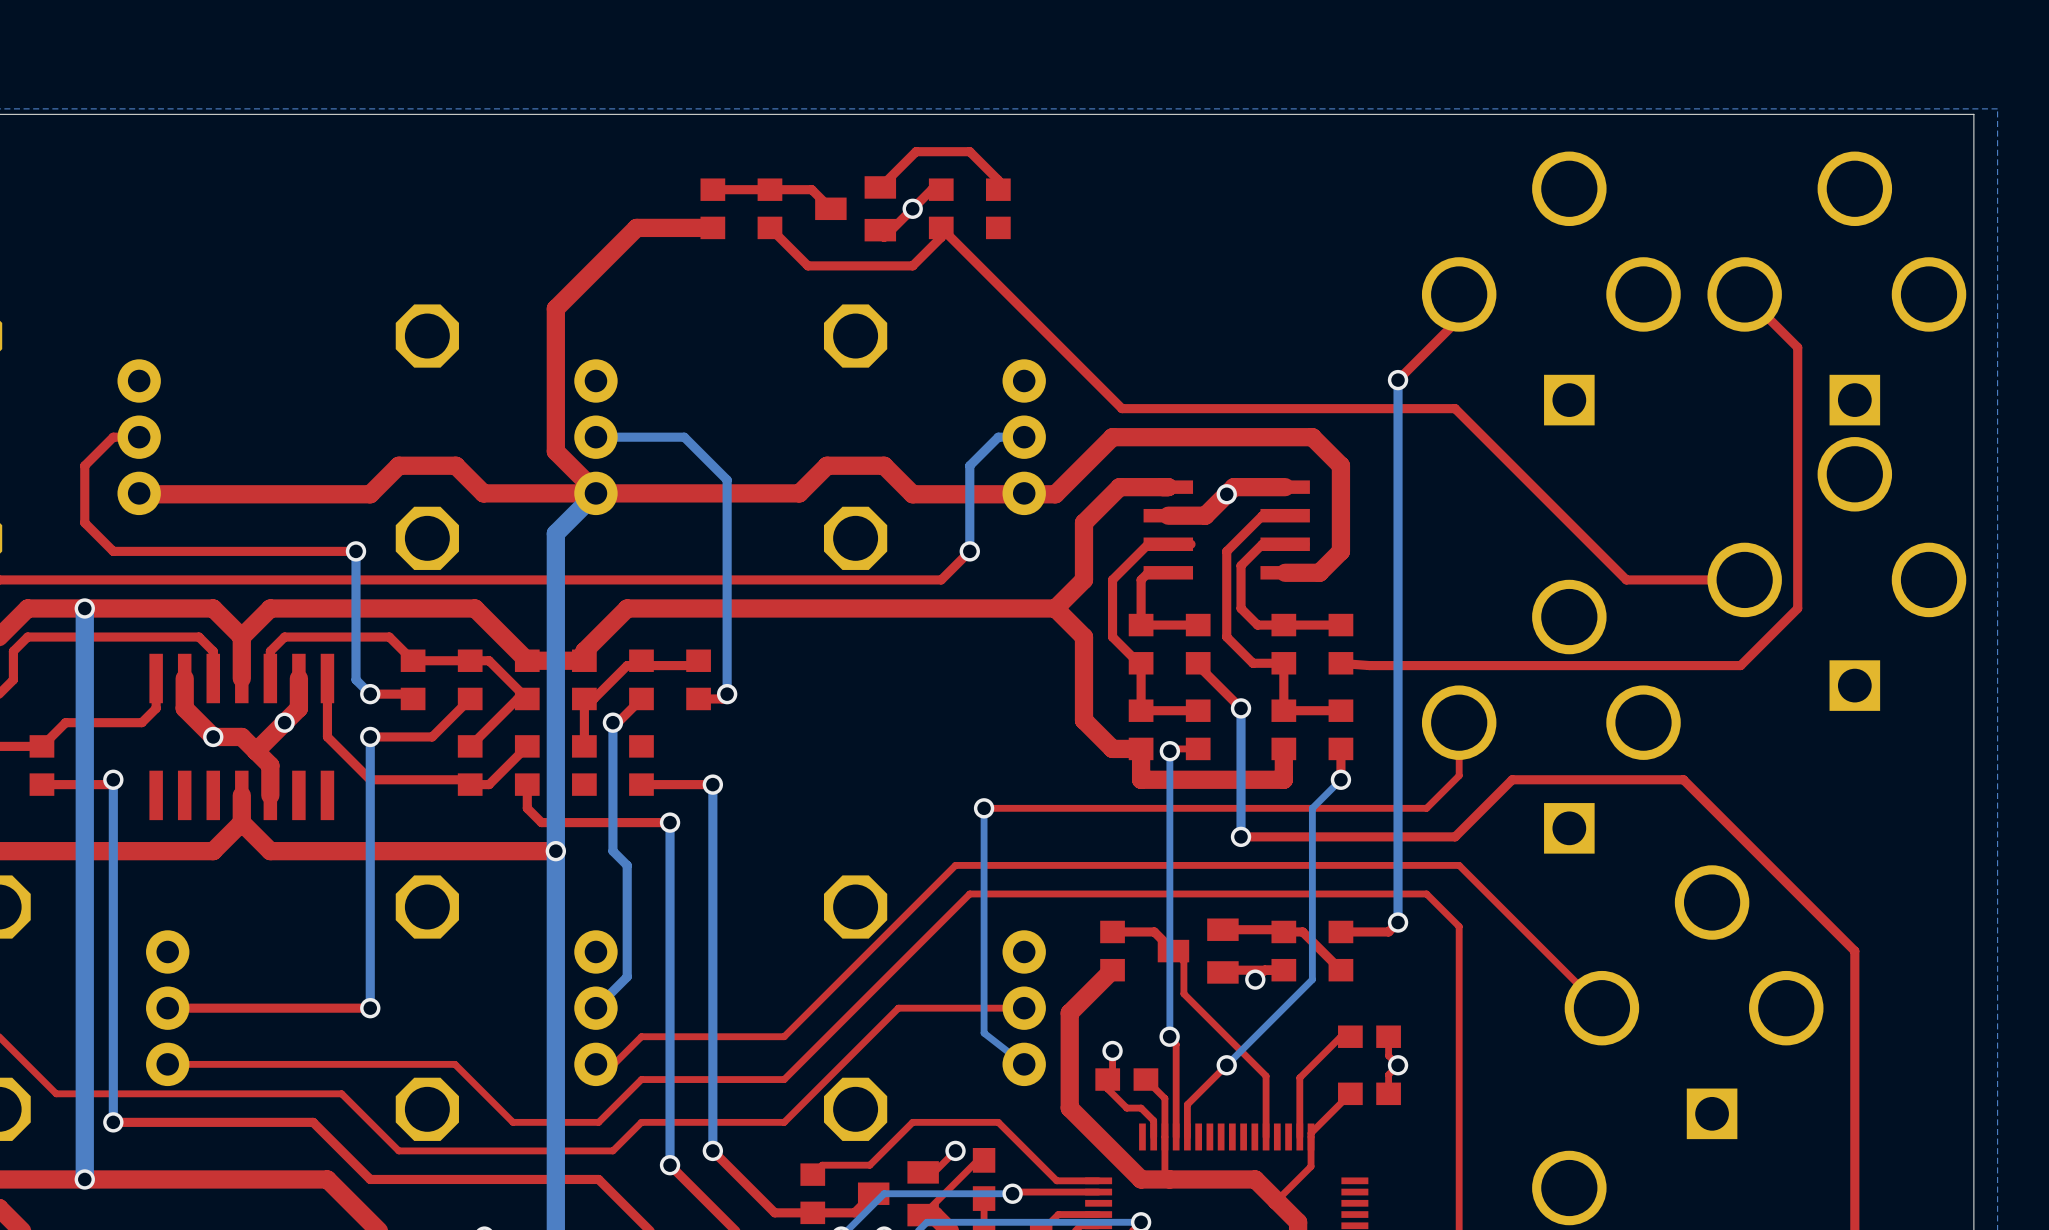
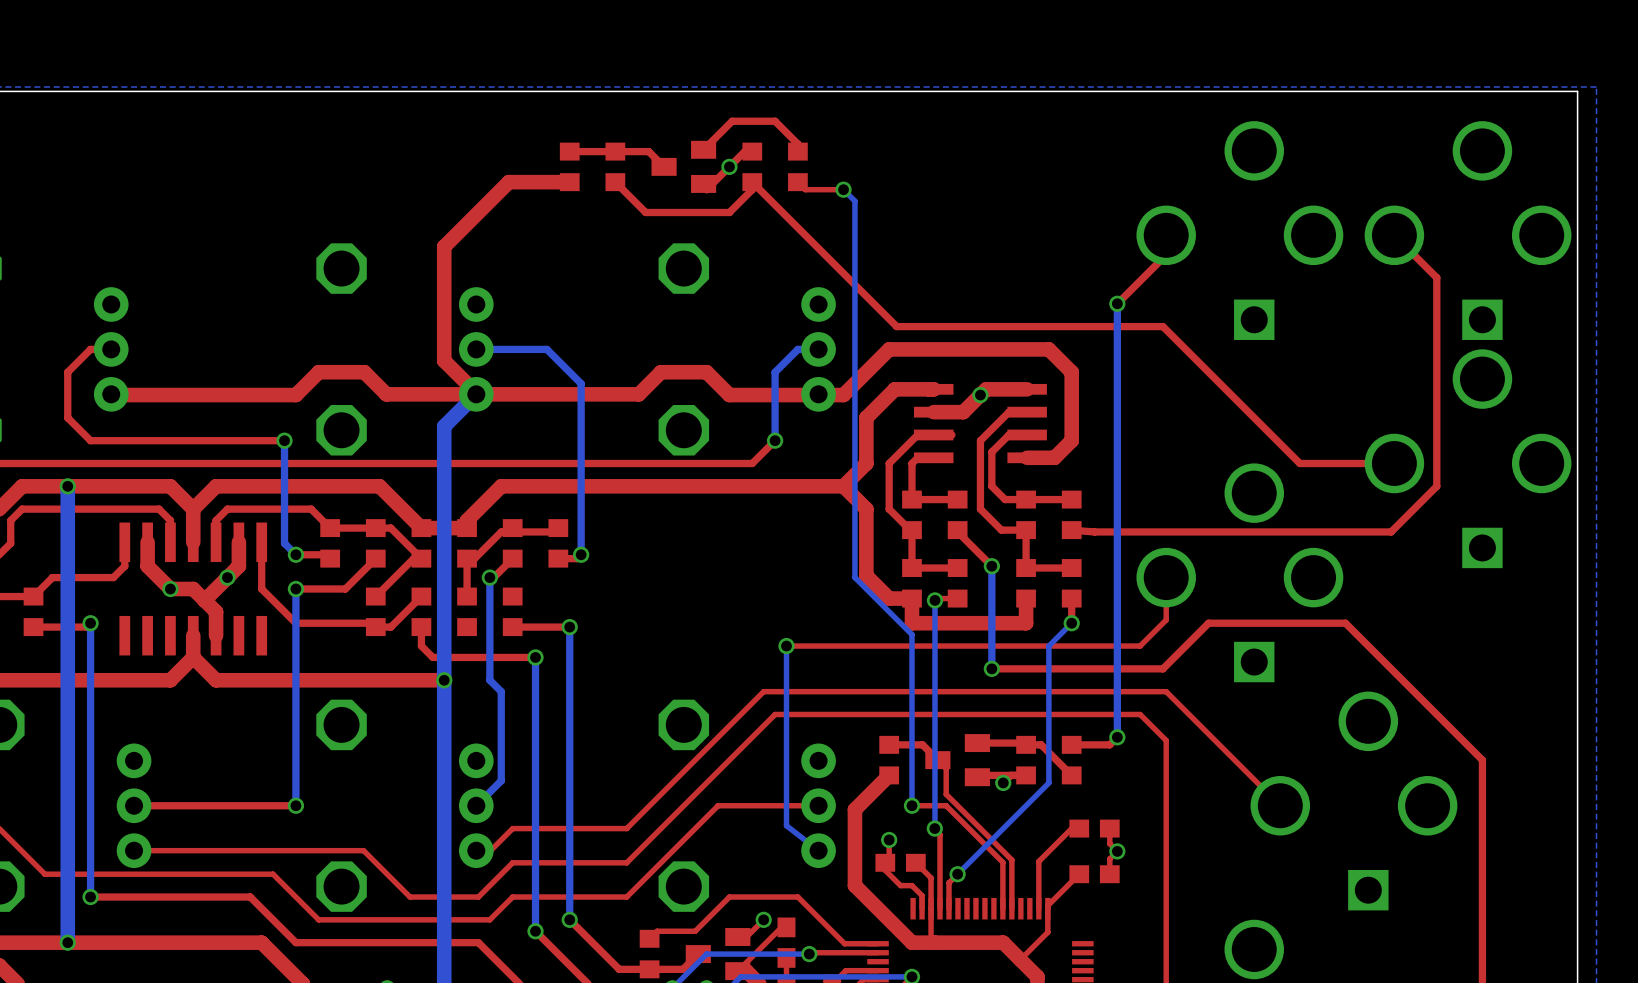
top track: none -> (797, 182) (805, 189) (843, 189)
bottom track: none -> (843, 189) (854, 201) (854, 577) (911, 634) (911, 805)
via: none -> (843, 189)
top track: none -> (911, 805) (946, 805) (1002, 862) (1002, 908)
via: none -> (911, 805)
top track: (1226, 1065) (1198, 1093) -> none
bottom track: none -> (980, 851) (957, 874)
via position: (1226, 1065) -> (957, 874)

